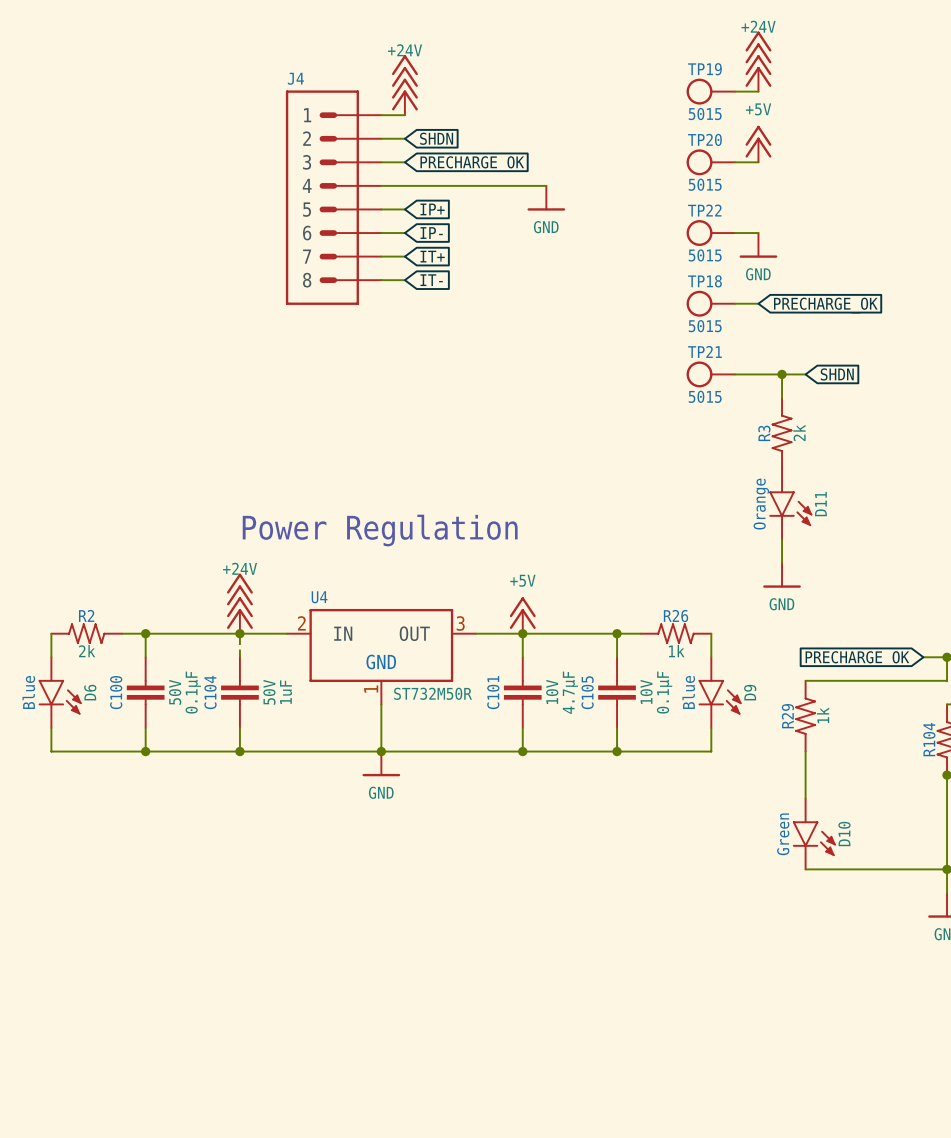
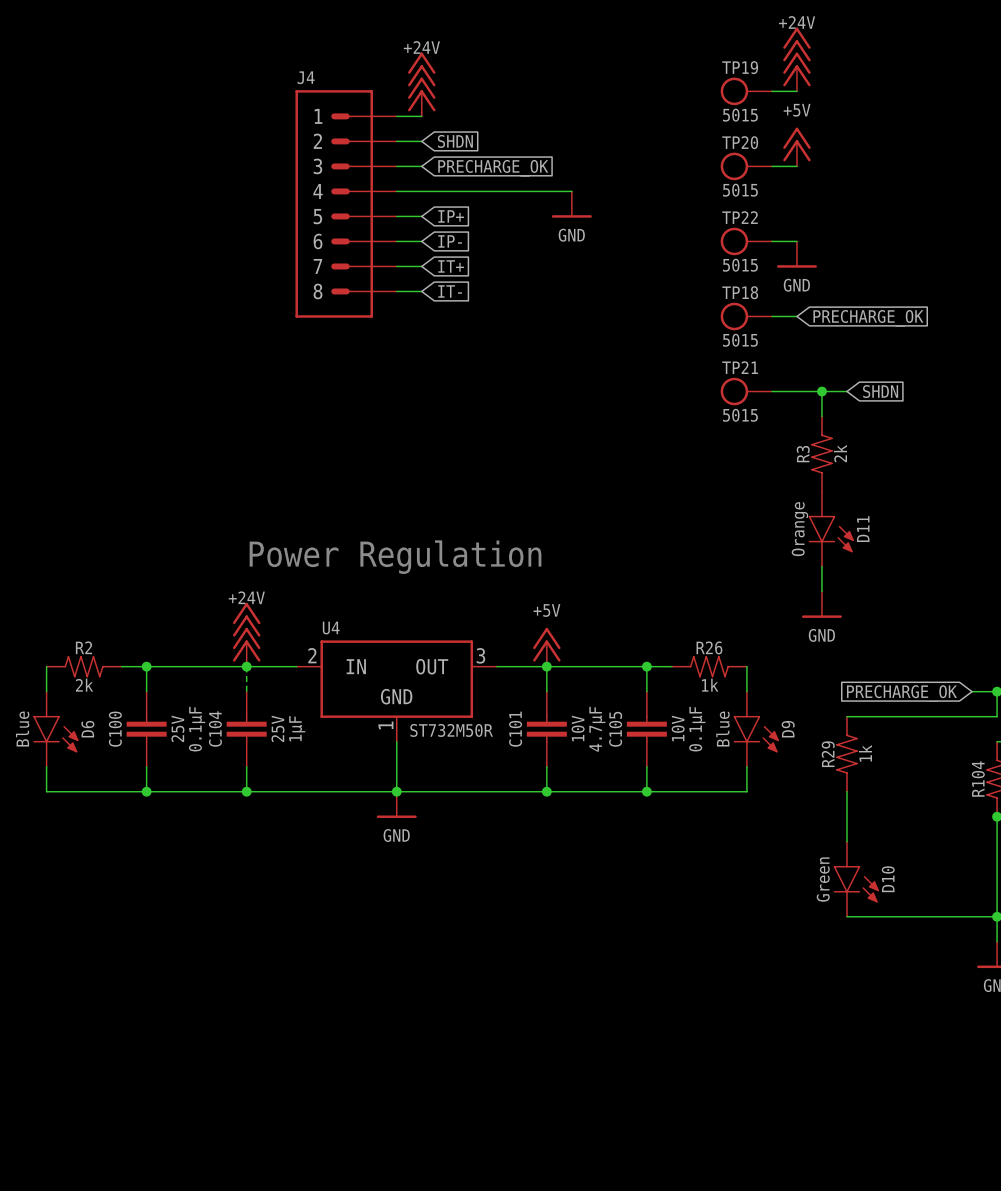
C100 text: 50V (175, 692) -> 25V (177, 728)
C104 text: 50V (269, 692) -> 25V (277, 728)
C104 text: 1uF (286, 692) -> 1µF (297, 728)

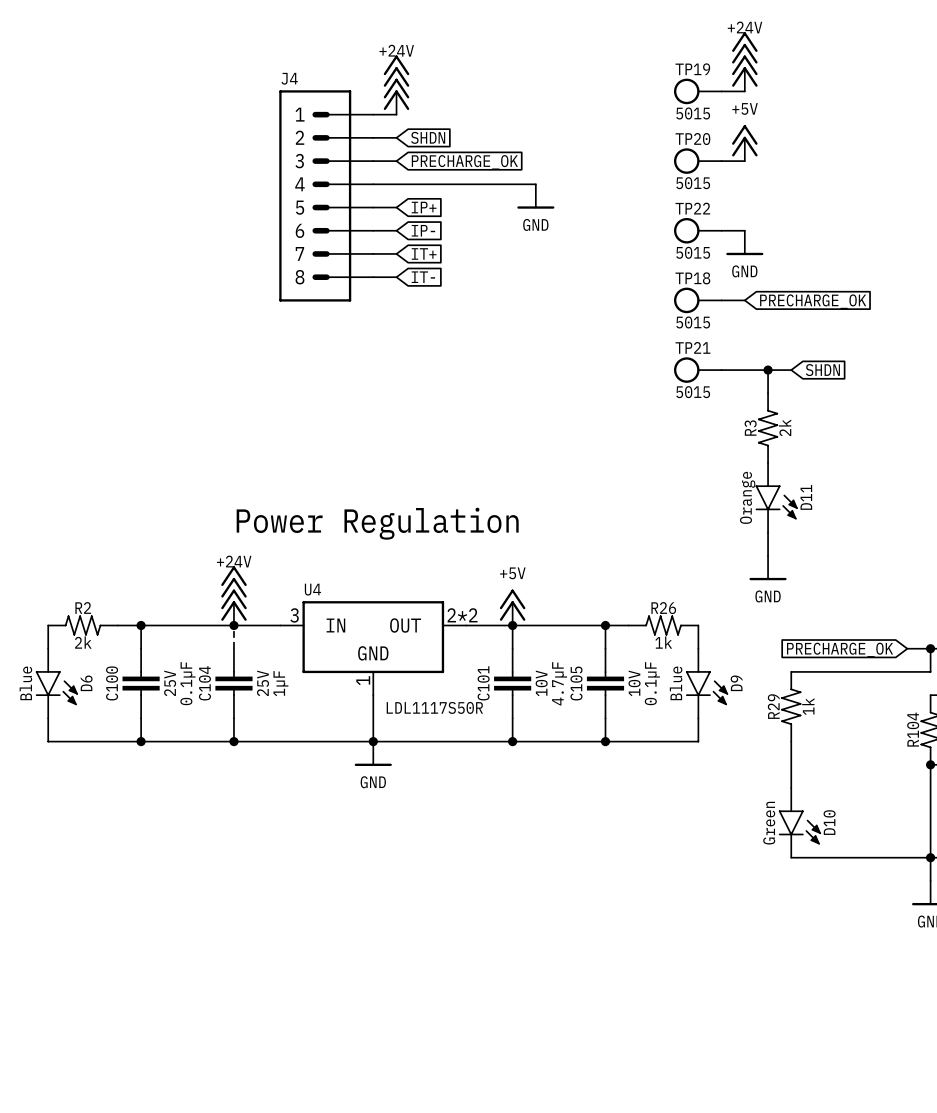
U4 pin number: 2 (312, 655) -> 3 (294, 615)
U4 pin number: 3 (480, 655) -> 2*2 (462, 615)
U4 text: ST732M50R (451, 730) -> LDL1117S50R (434, 707)

